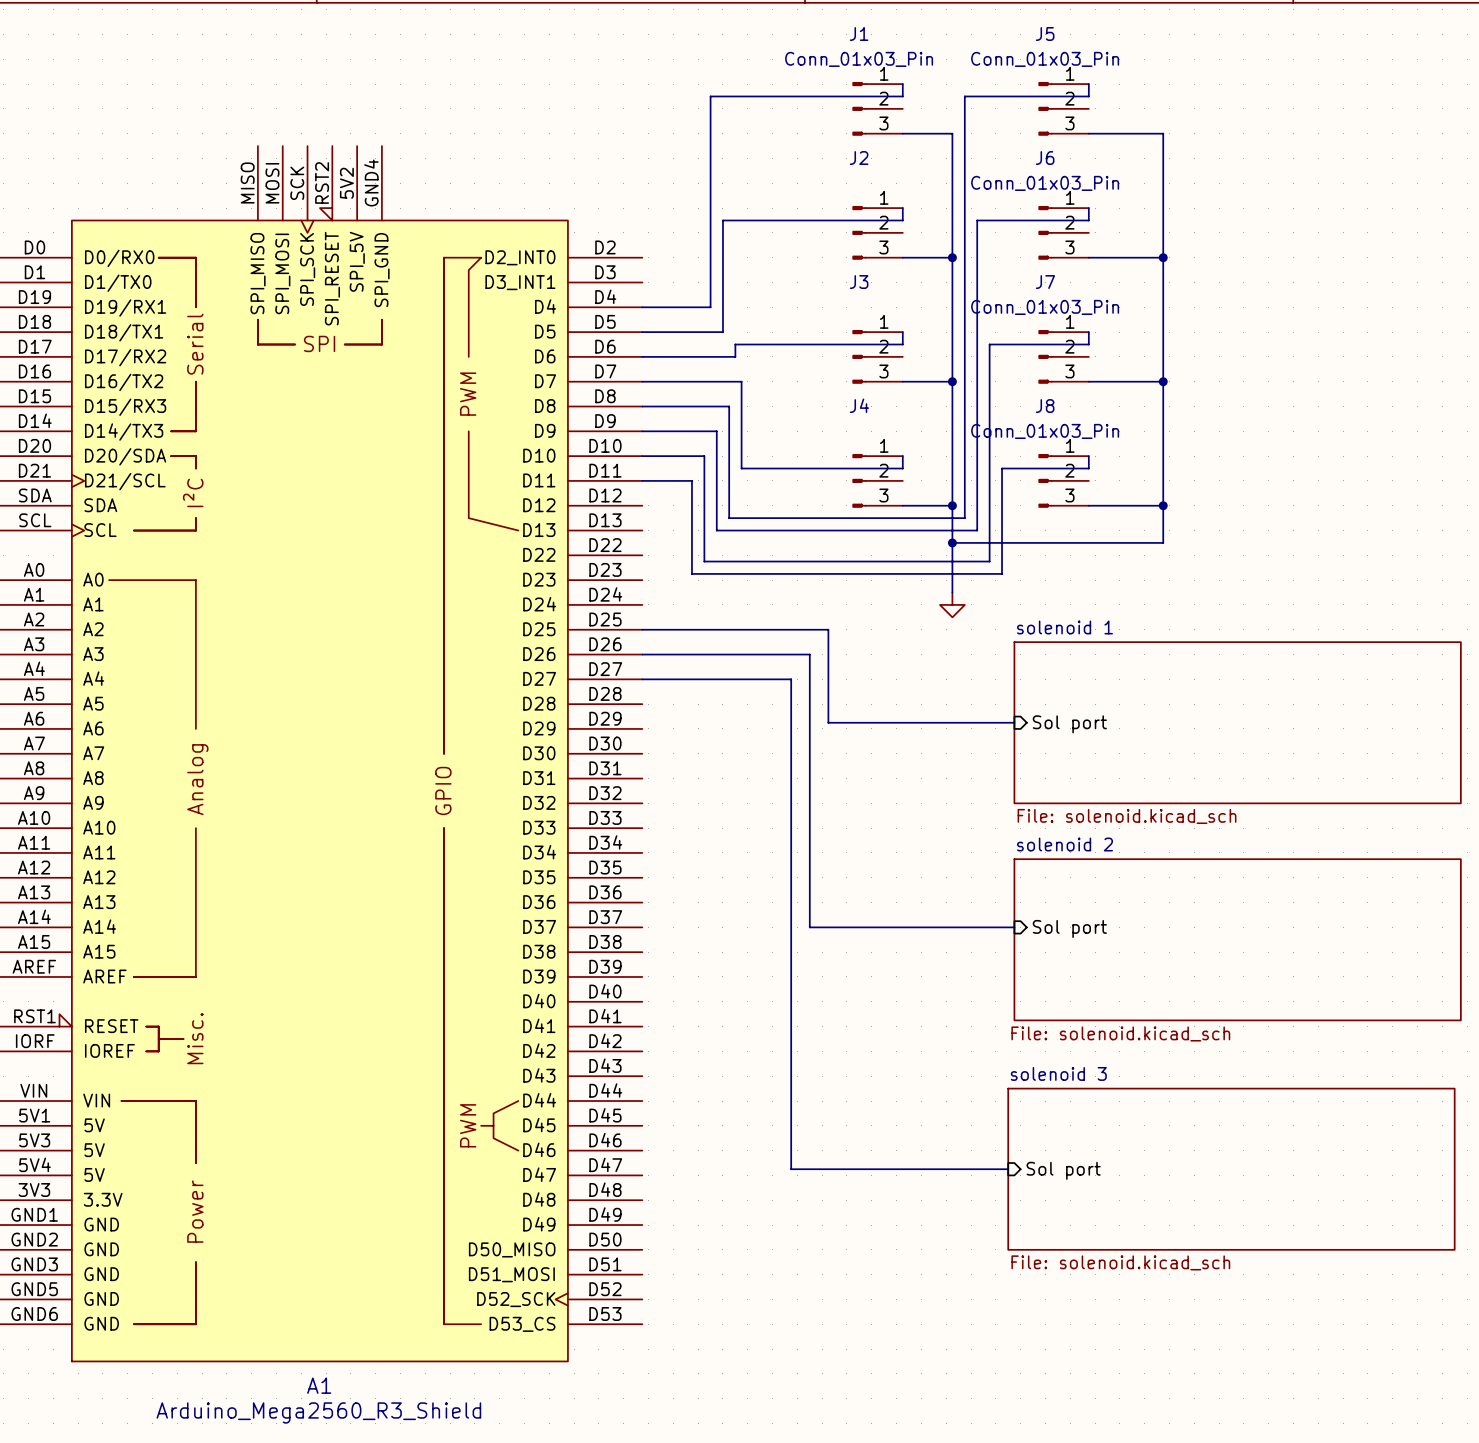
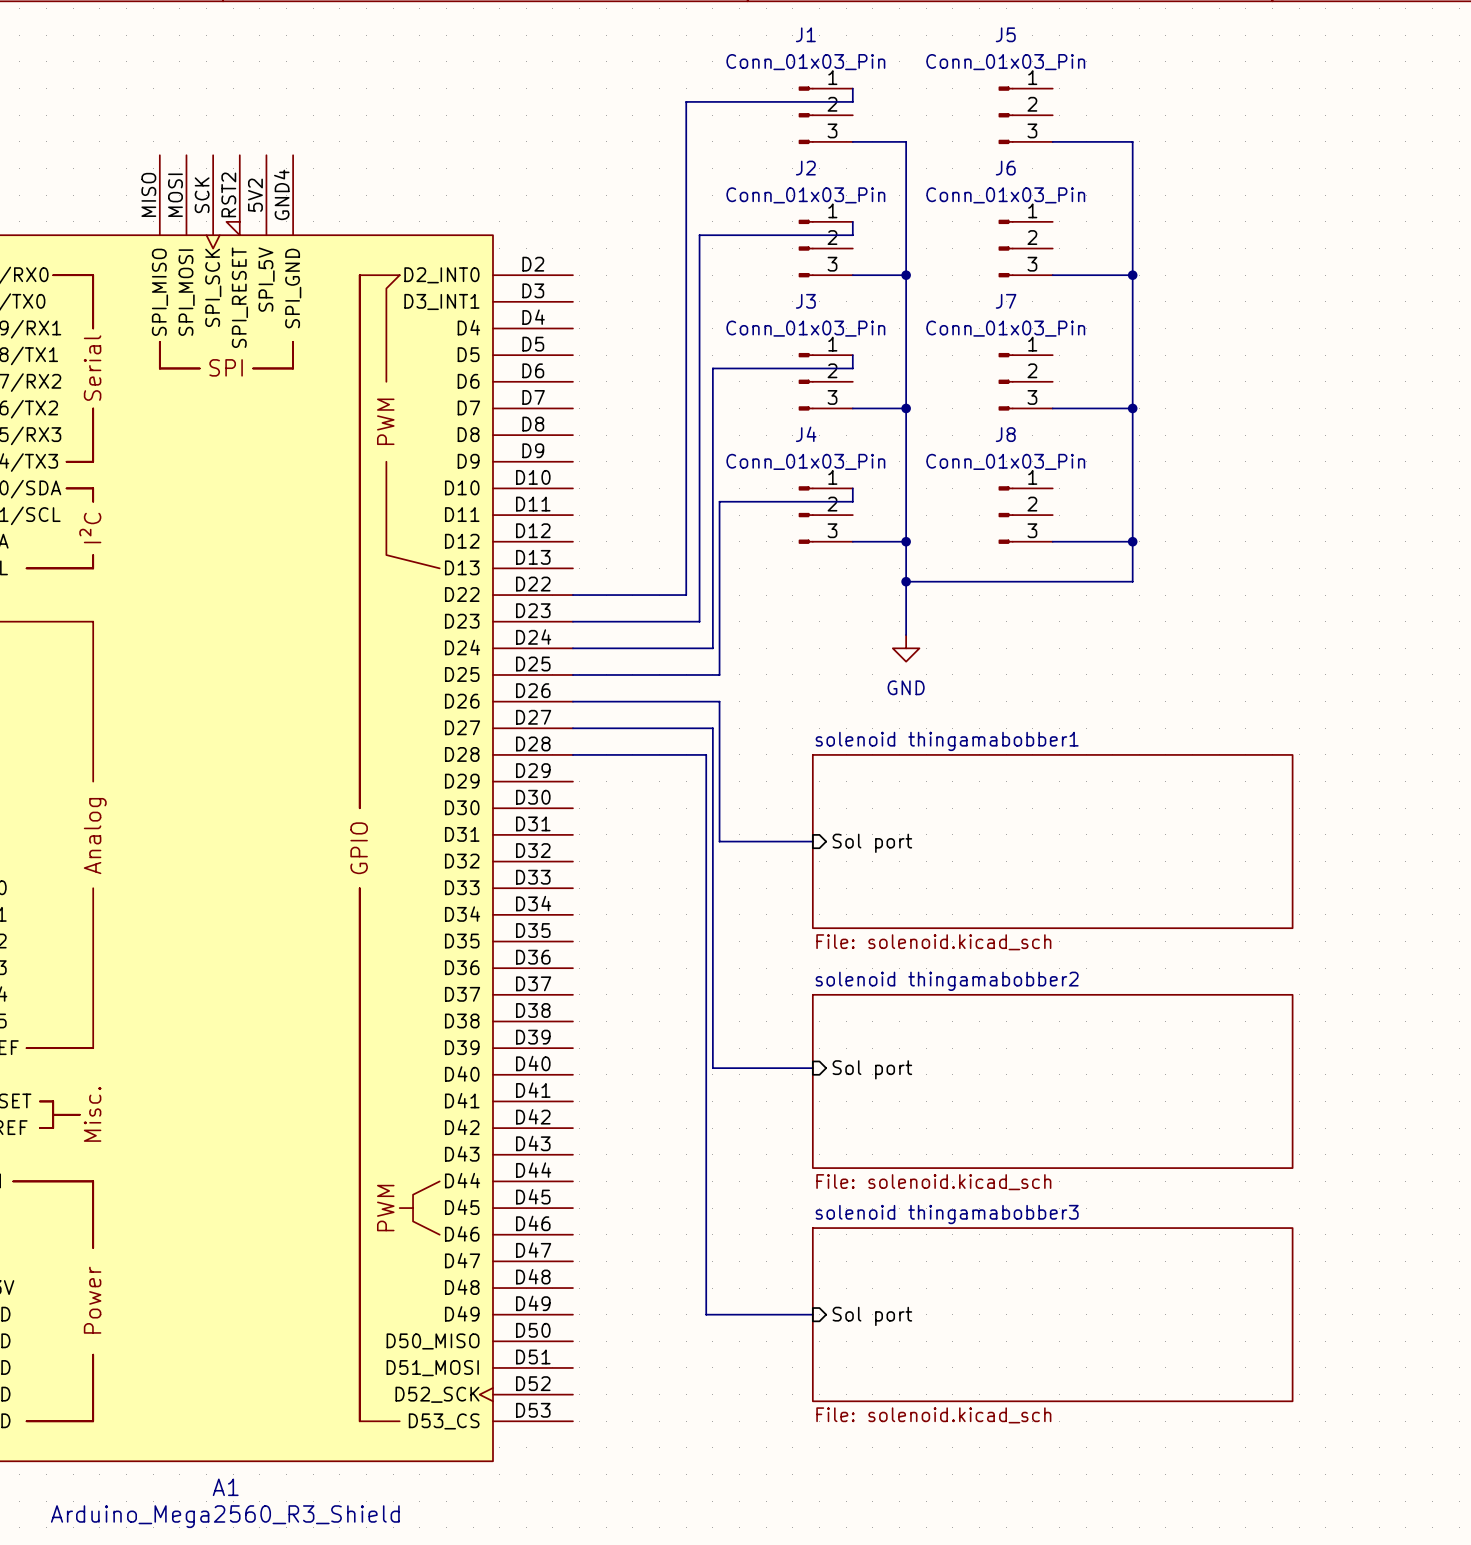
wire: (1088, 84) (1088, 96) (964, 96) (964, 518) (729, 518) (729, 406) (642, 406) -> none
wire: (747, 96) (710, 96) (710, 307) (642, 307) -> (686, 101) (686, 595) (572, 595)
J2 value: none -> Conn_01x03_Pin (805, 195)
wire: (1088, 208) (1088, 220) (977, 220) (977, 530) (716, 530) (716, 431) (642, 431) -> none
wire: (760, 220) (722, 220) (722, 332) (642, 332) -> (699, 235) (699, 621) (572, 621)
J3 value: none -> Conn_01x03_Pin (805, 328)
wire: (1088, 332) (1088, 344) (989, 344) (989, 561) (704, 561) (704, 456) (642, 456) -> none
wire: (772, 344) (735, 344) (735, 356) (642, 356) -> (712, 368) (712, 648) (572, 648)
wire: (642, 381) (741, 381) (741, 468) (778, 468) -> (719, 674) (719, 501)
J4 value: none -> Conn_01x03_Pin (805, 461)
wire: (1088, 456) (1088, 468) (1002, 468) (1002, 573) (691, 573) (691, 480) (642, 480) -> none
wire: (778, 629) (828, 629) (828, 722) (1014, 722) -> none
power symbol text: none -> GND (906, 687)
wire: (778, 654) (809, 654) (809, 927) (1014, 927) -> (719, 701) (719, 841) (812, 841)
wire: (772, 679) (791, 679) (791, 1169) (1008, 1169) -> (712, 728) (712, 1068) (812, 1068)
wire: none -> (572, 754) (706, 754) (706, 1314) (812, 1314)
sheet solenoid 1: File: solenoid.kicad_sch (1237, 722) -> none
sheet pin: Sol port (1069, 724) -> none
sheet solenoid thingamabobber1: none -> File: solenoid.kicad_sch (1052, 841)
sheet pin: none -> Sol port (872, 843)
sheet pin: Sol port (1069, 928) -> none
sheet solenoid 2: File: solenoid.kicad_sch (1237, 939) -> none
sheet pin: none -> Sol port (872, 1069)
sheet solenoid thingamabobber2: none -> File: solenoid.kicad_sch (1052, 1081)
sheet solenoid 3: File: solenoid.kicad_sch (1231, 1169) -> none
sheet pin: Sol port (1063, 1170) -> none
sheet solenoid thingamabobber3: none -> File: solenoid.kicad_sch (1052, 1314)
sheet pin: none -> Sol port (872, 1316)

